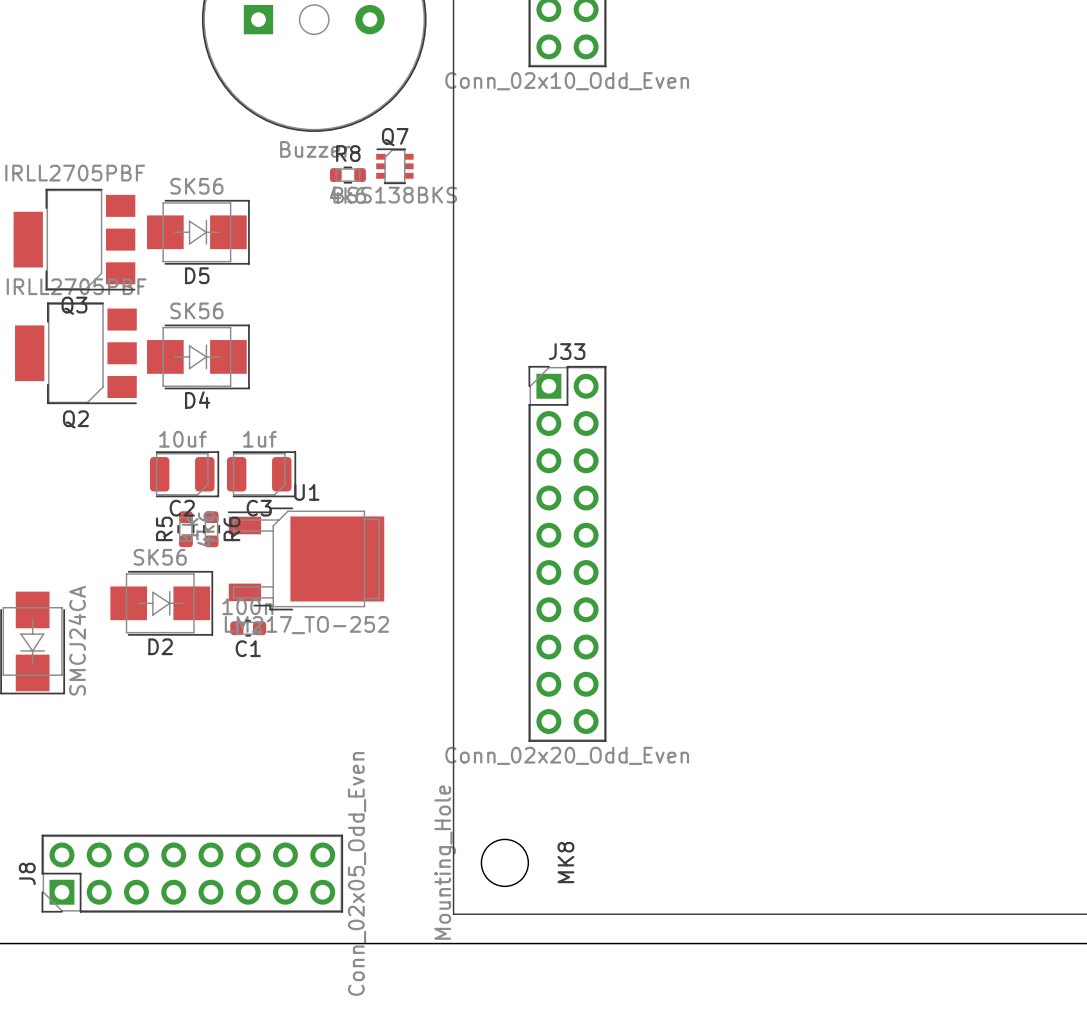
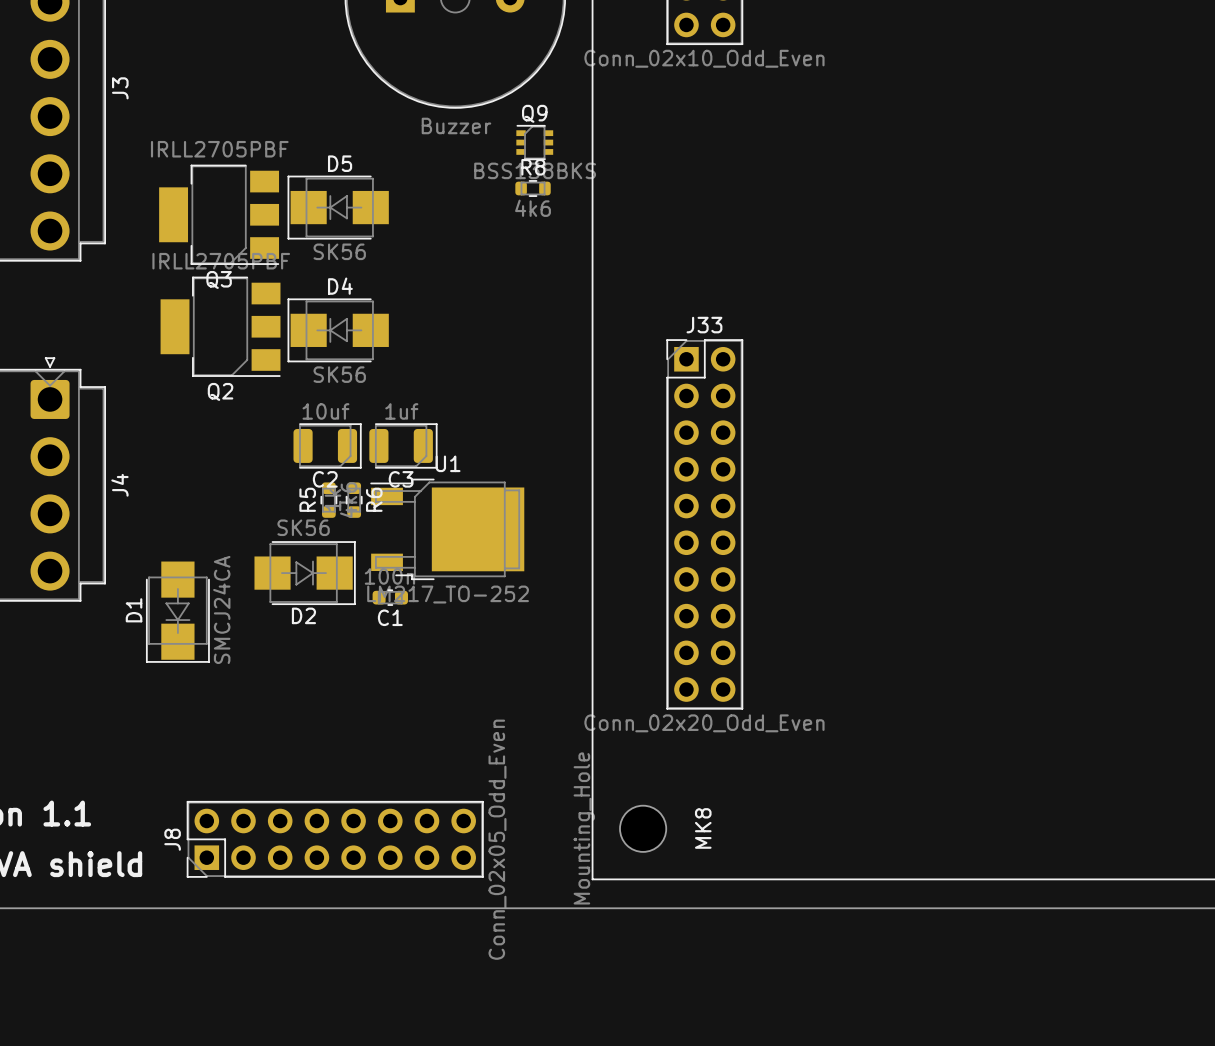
Q7 name: Q7 (395, 137) -> Q9 (534, 113)
R8 position: (347, 175) -> (533, 188)
D5 rotation: 0° (198, 232) -> 180° (338, 207)
D4 rotation: 0° (198, 356) -> 180° (338, 330)

